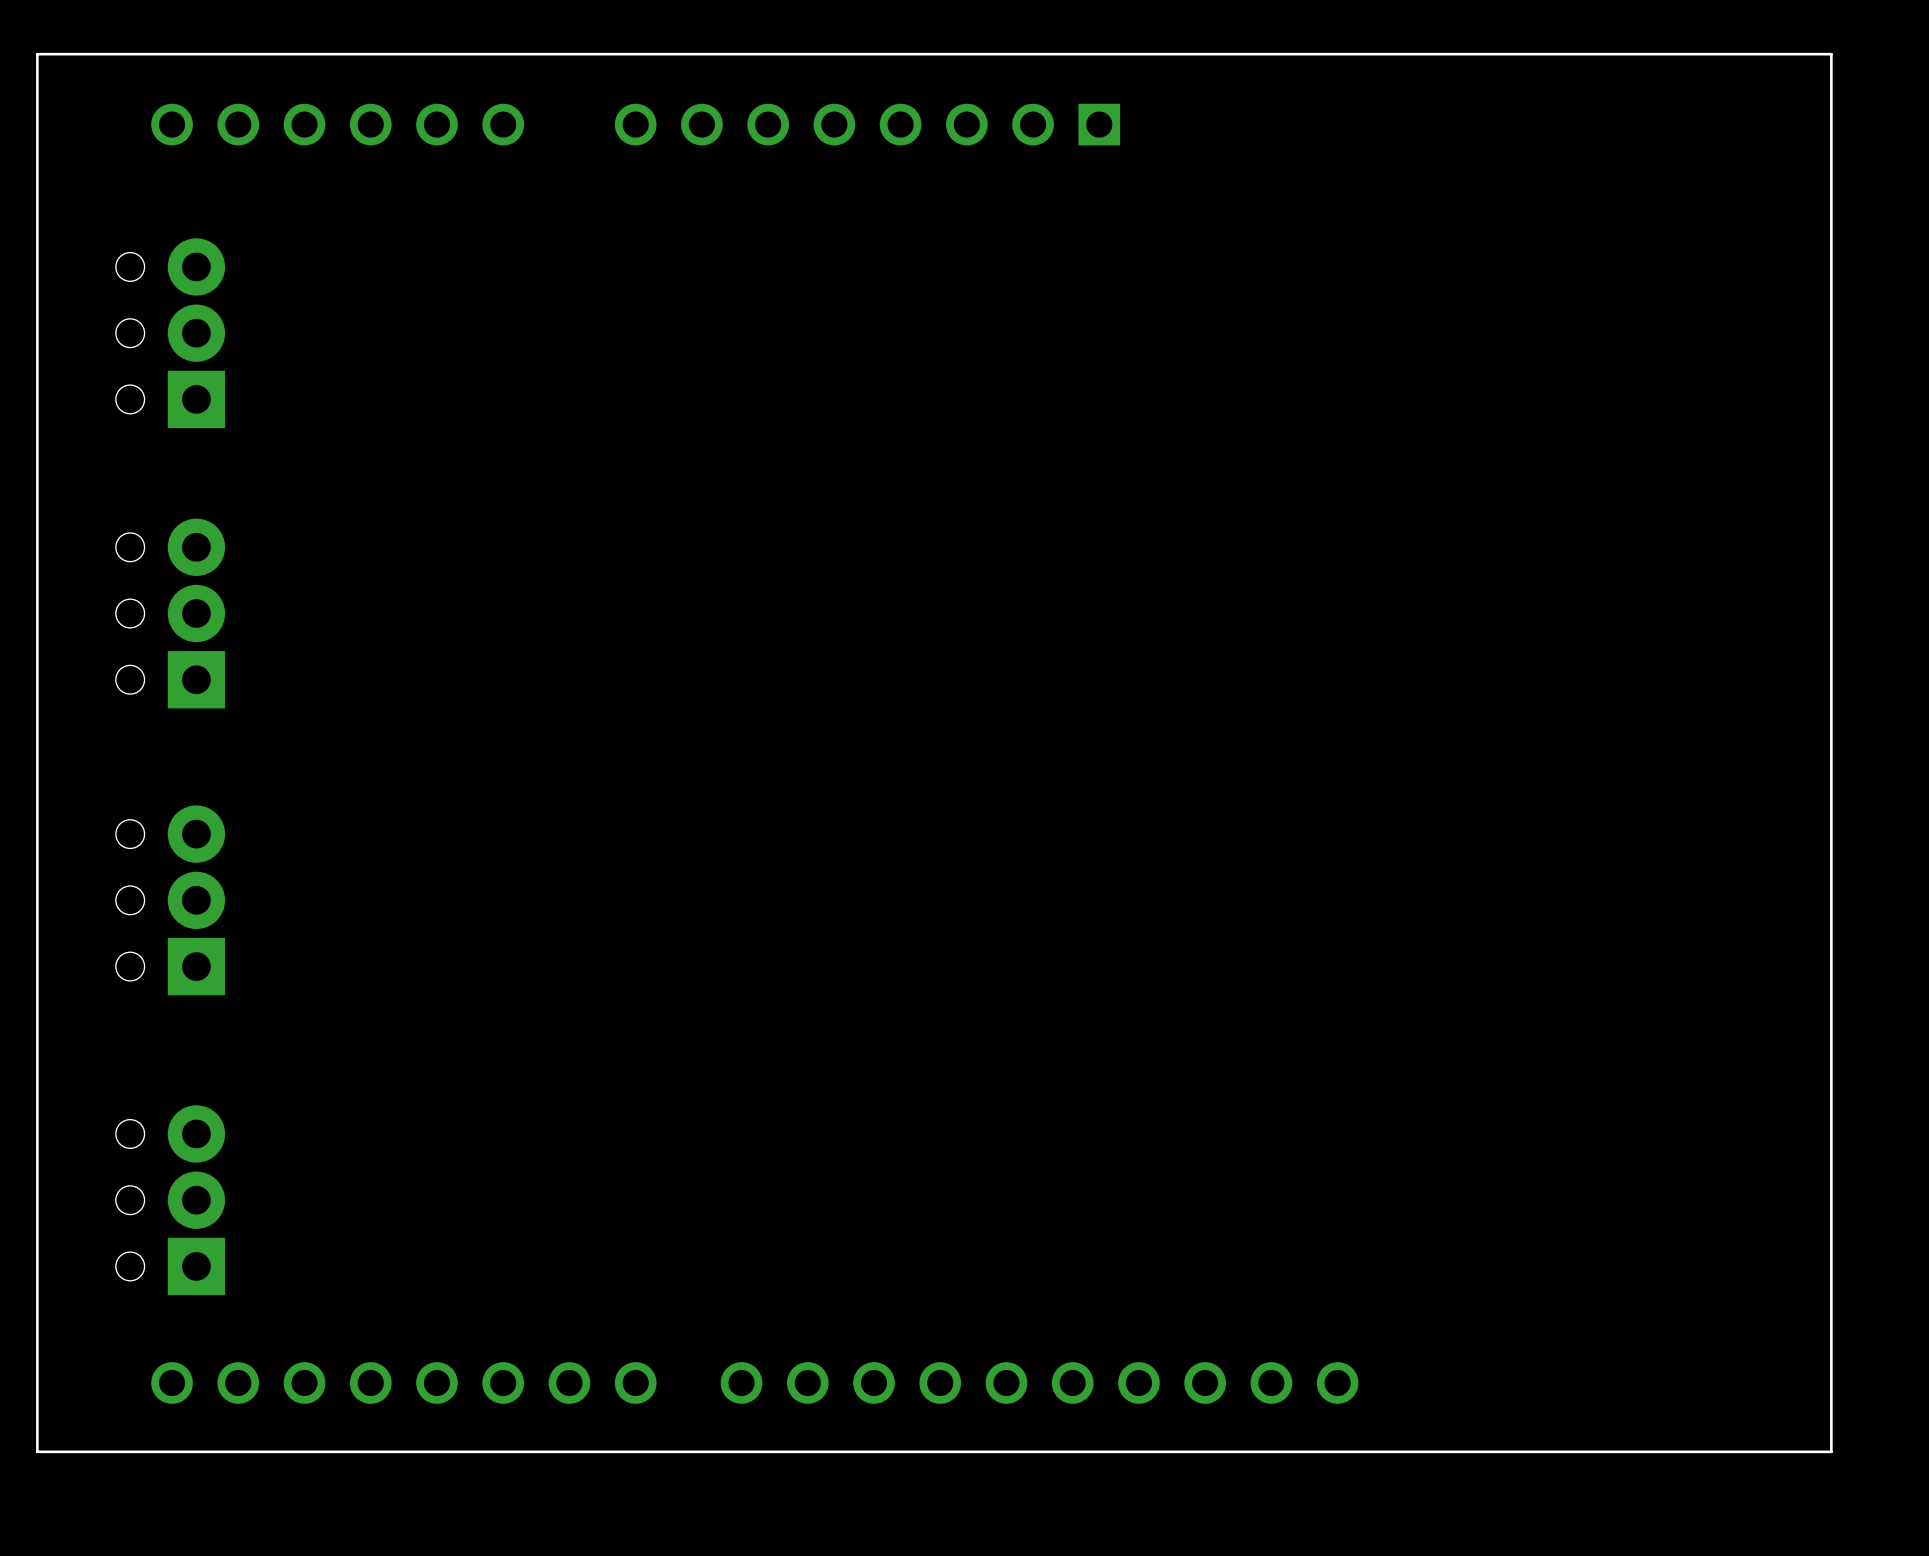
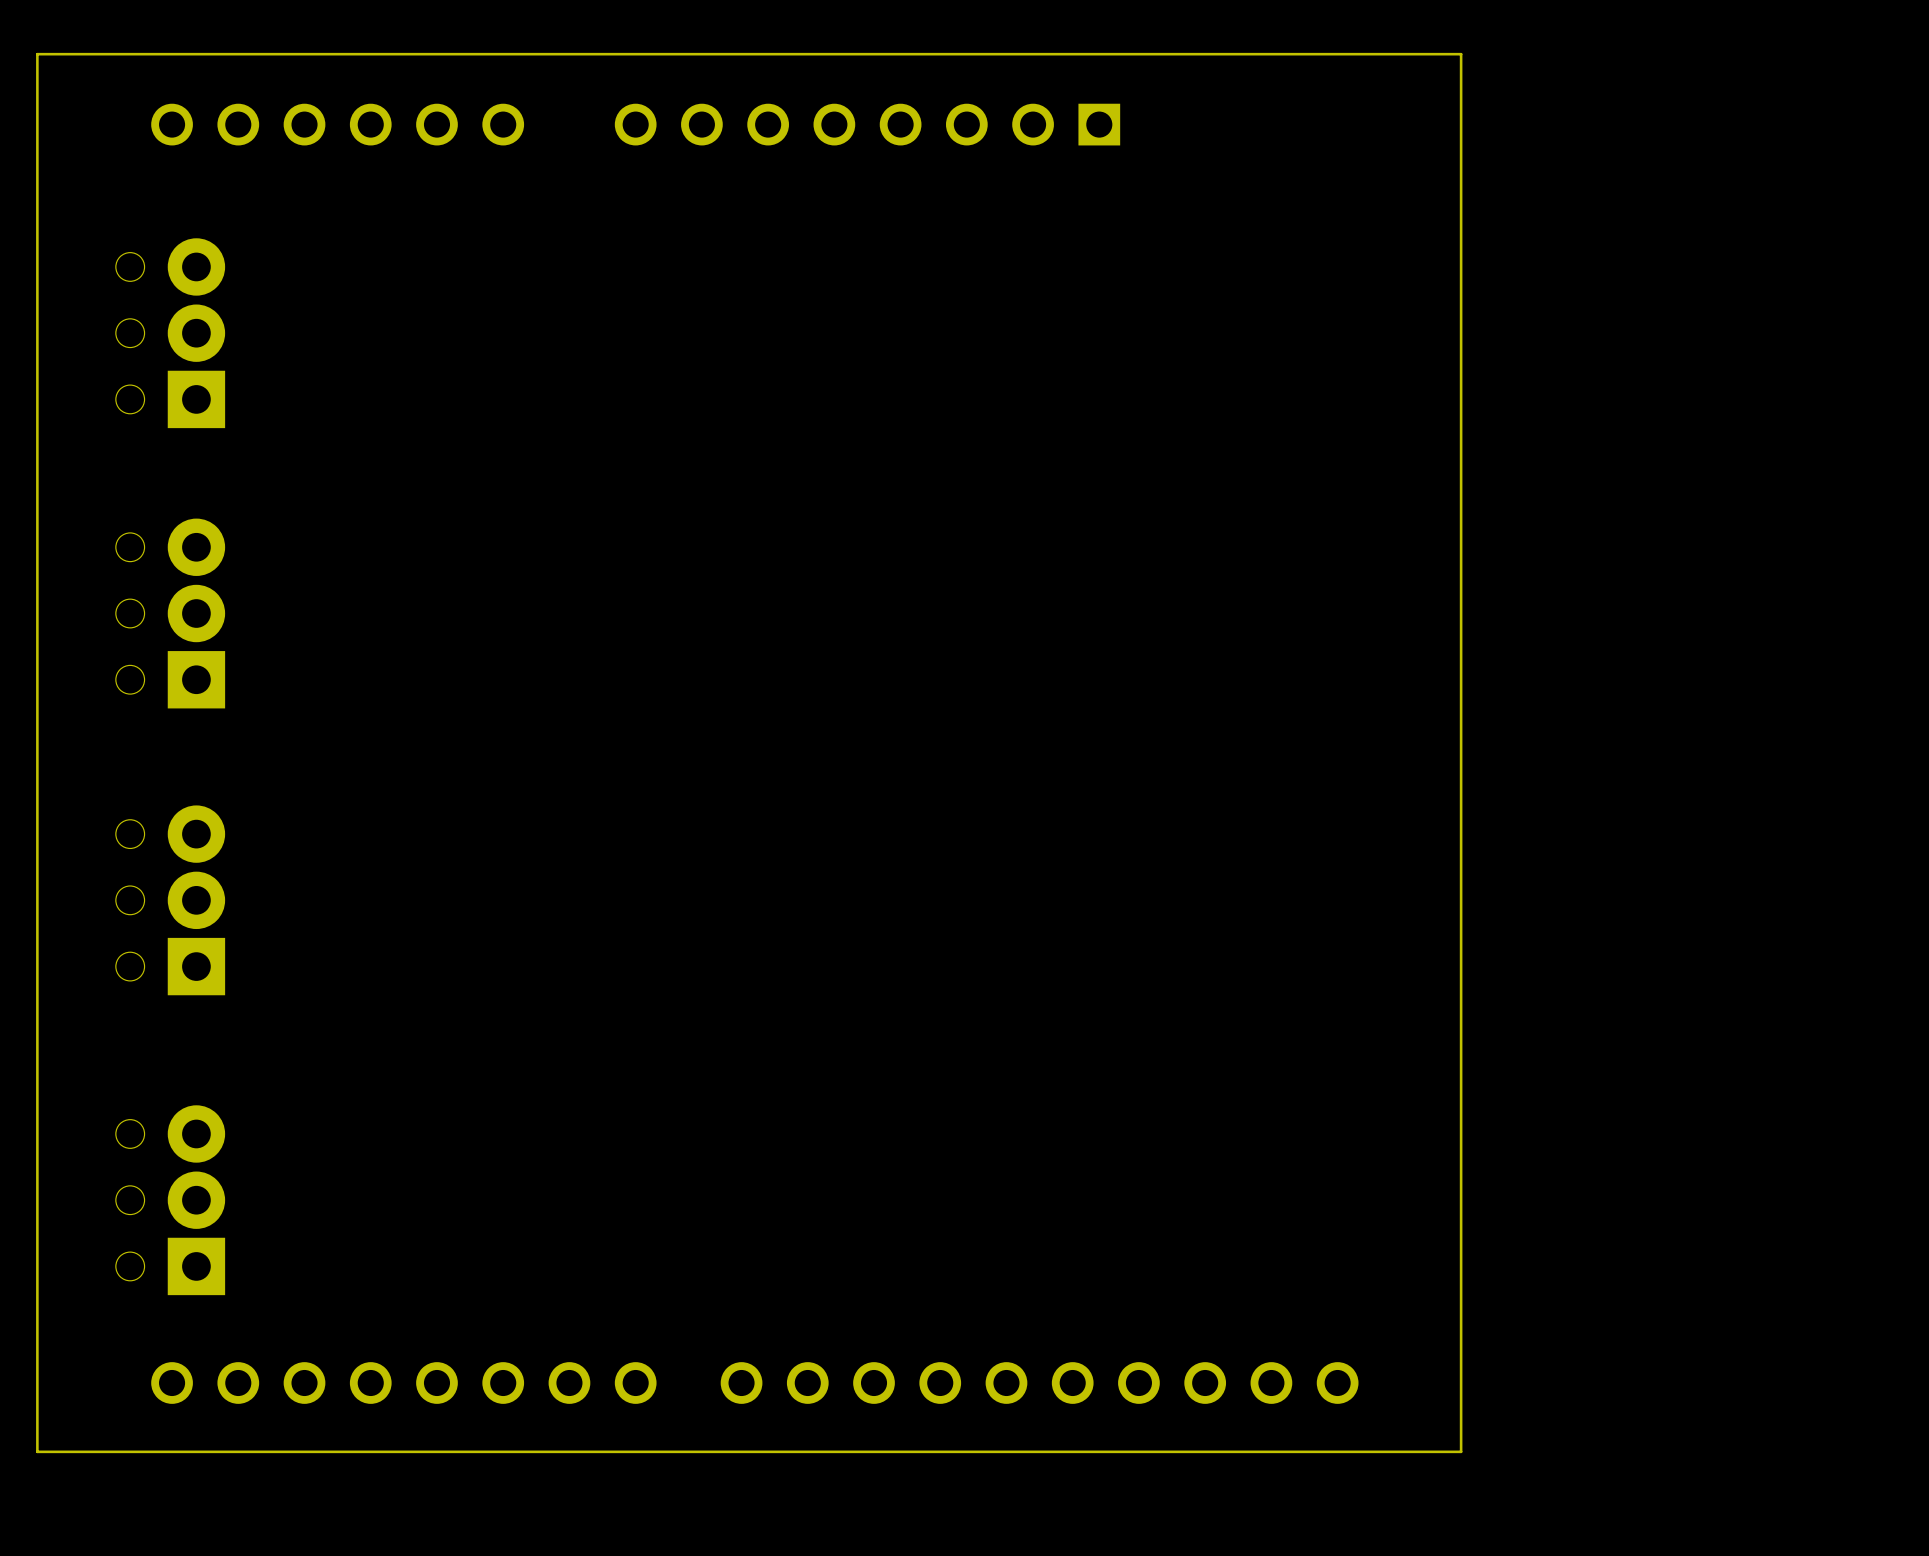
board edge: (1461, 54) (1831, 54) (1831, 1451) (1461, 1451) -> (1461, 54) (1461, 1451)

